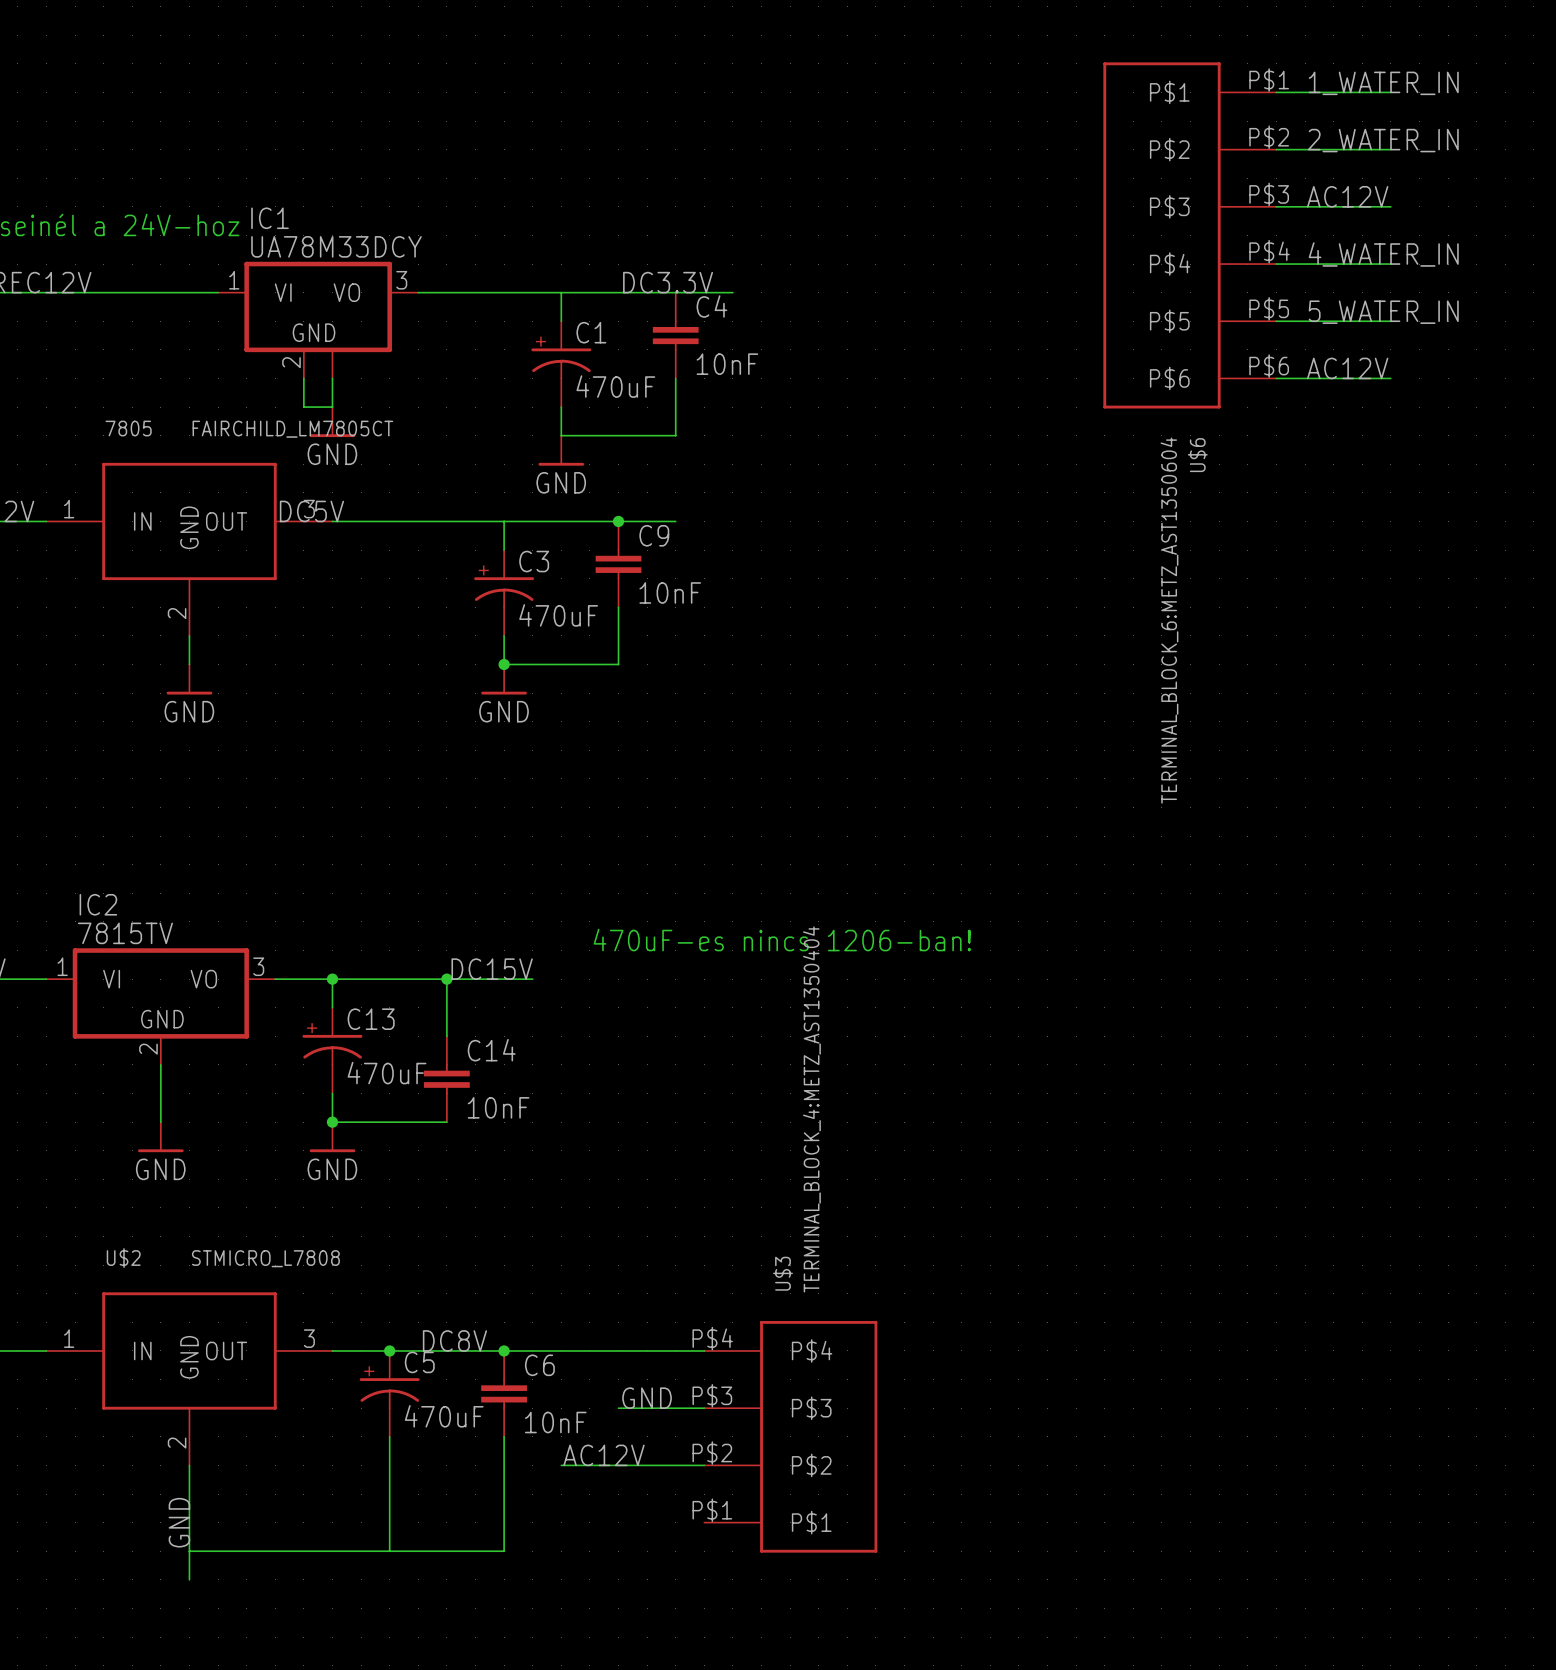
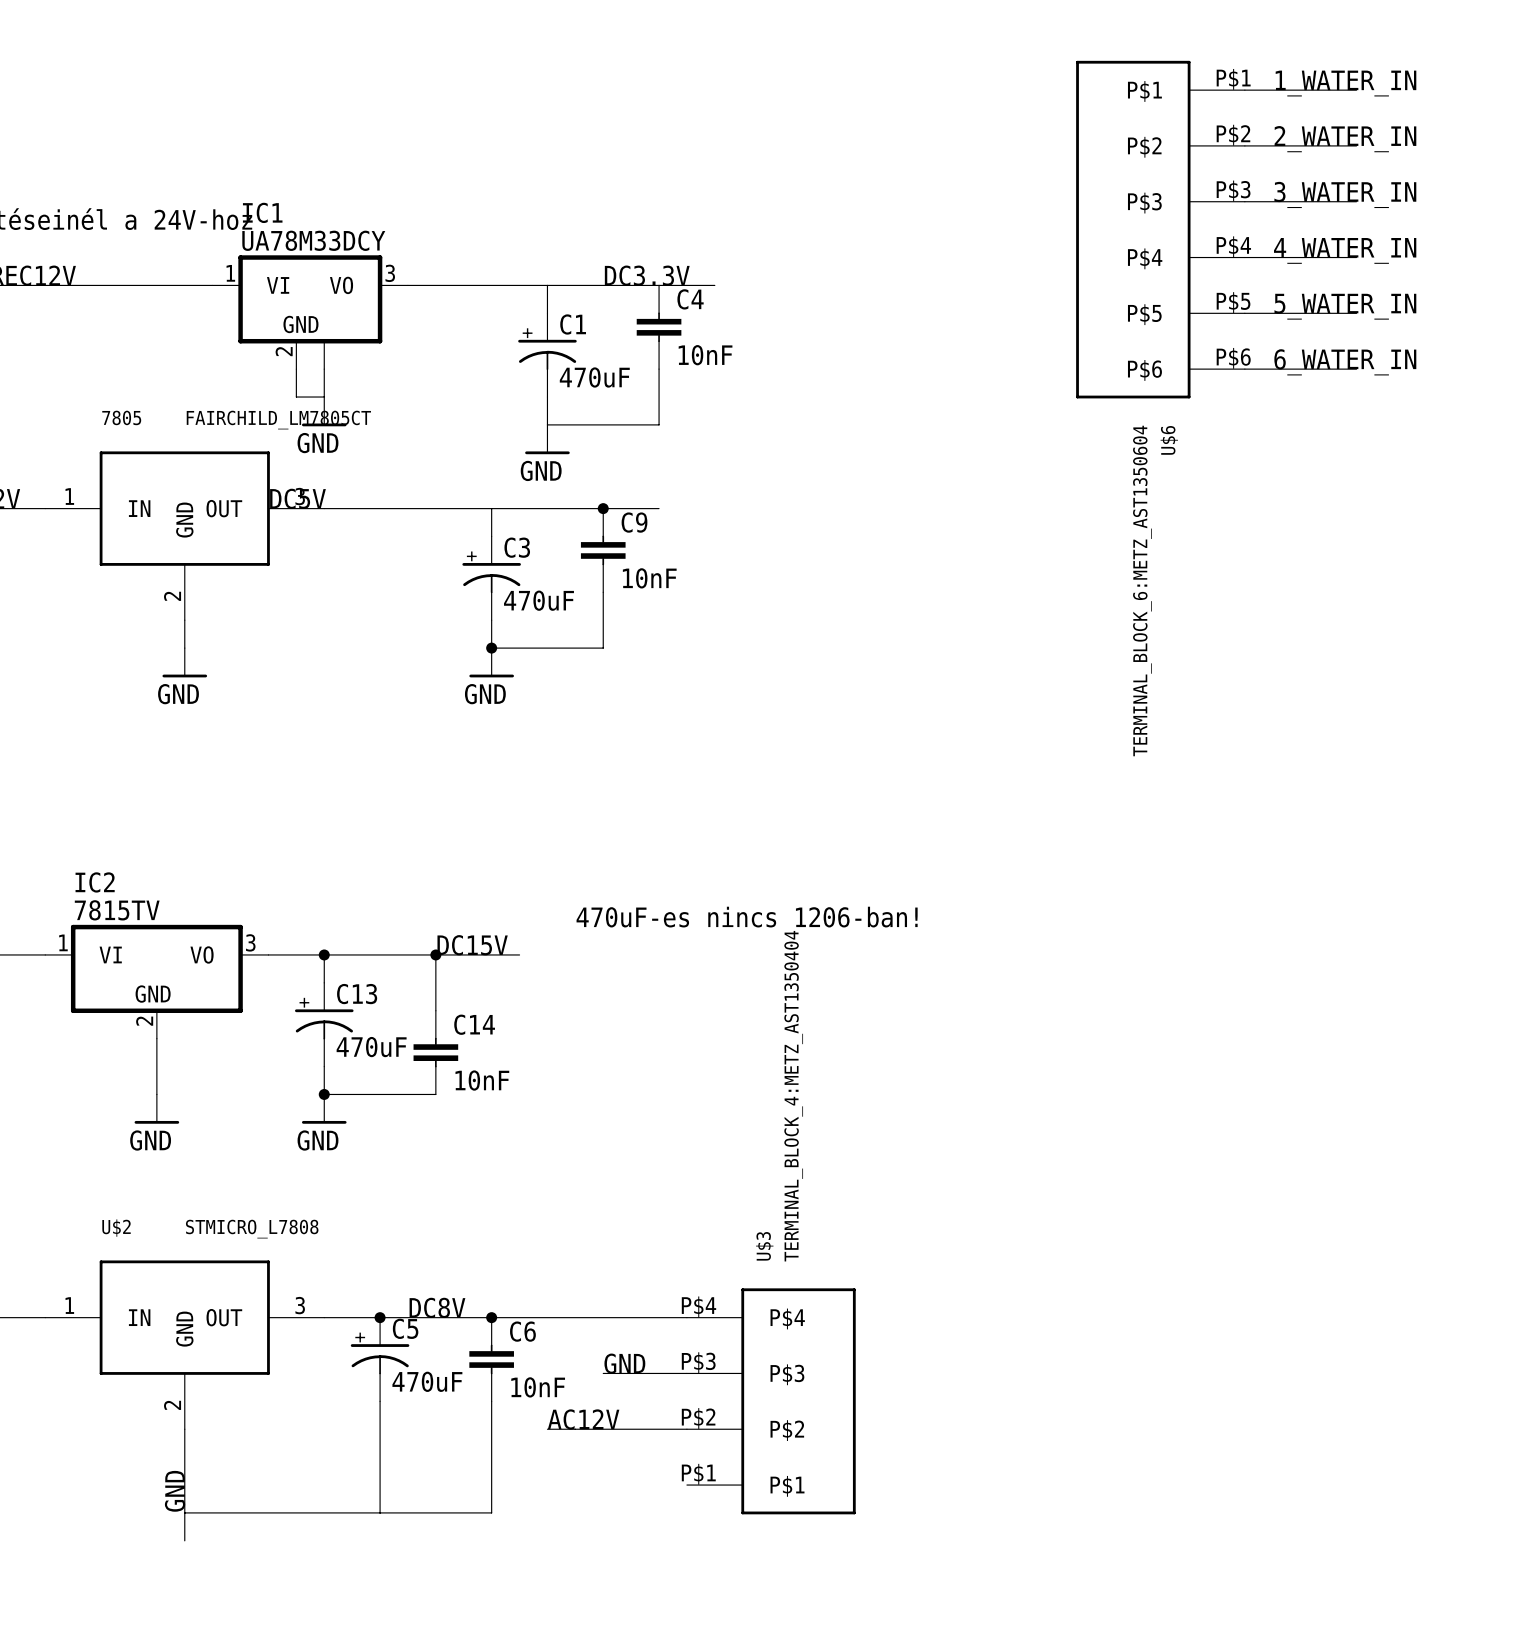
label: AC12V (1347, 196) -> 3_WATER_IN (1345, 194)
label: AC12V (1347, 368) -> 6_WATER_IN (1345, 362)

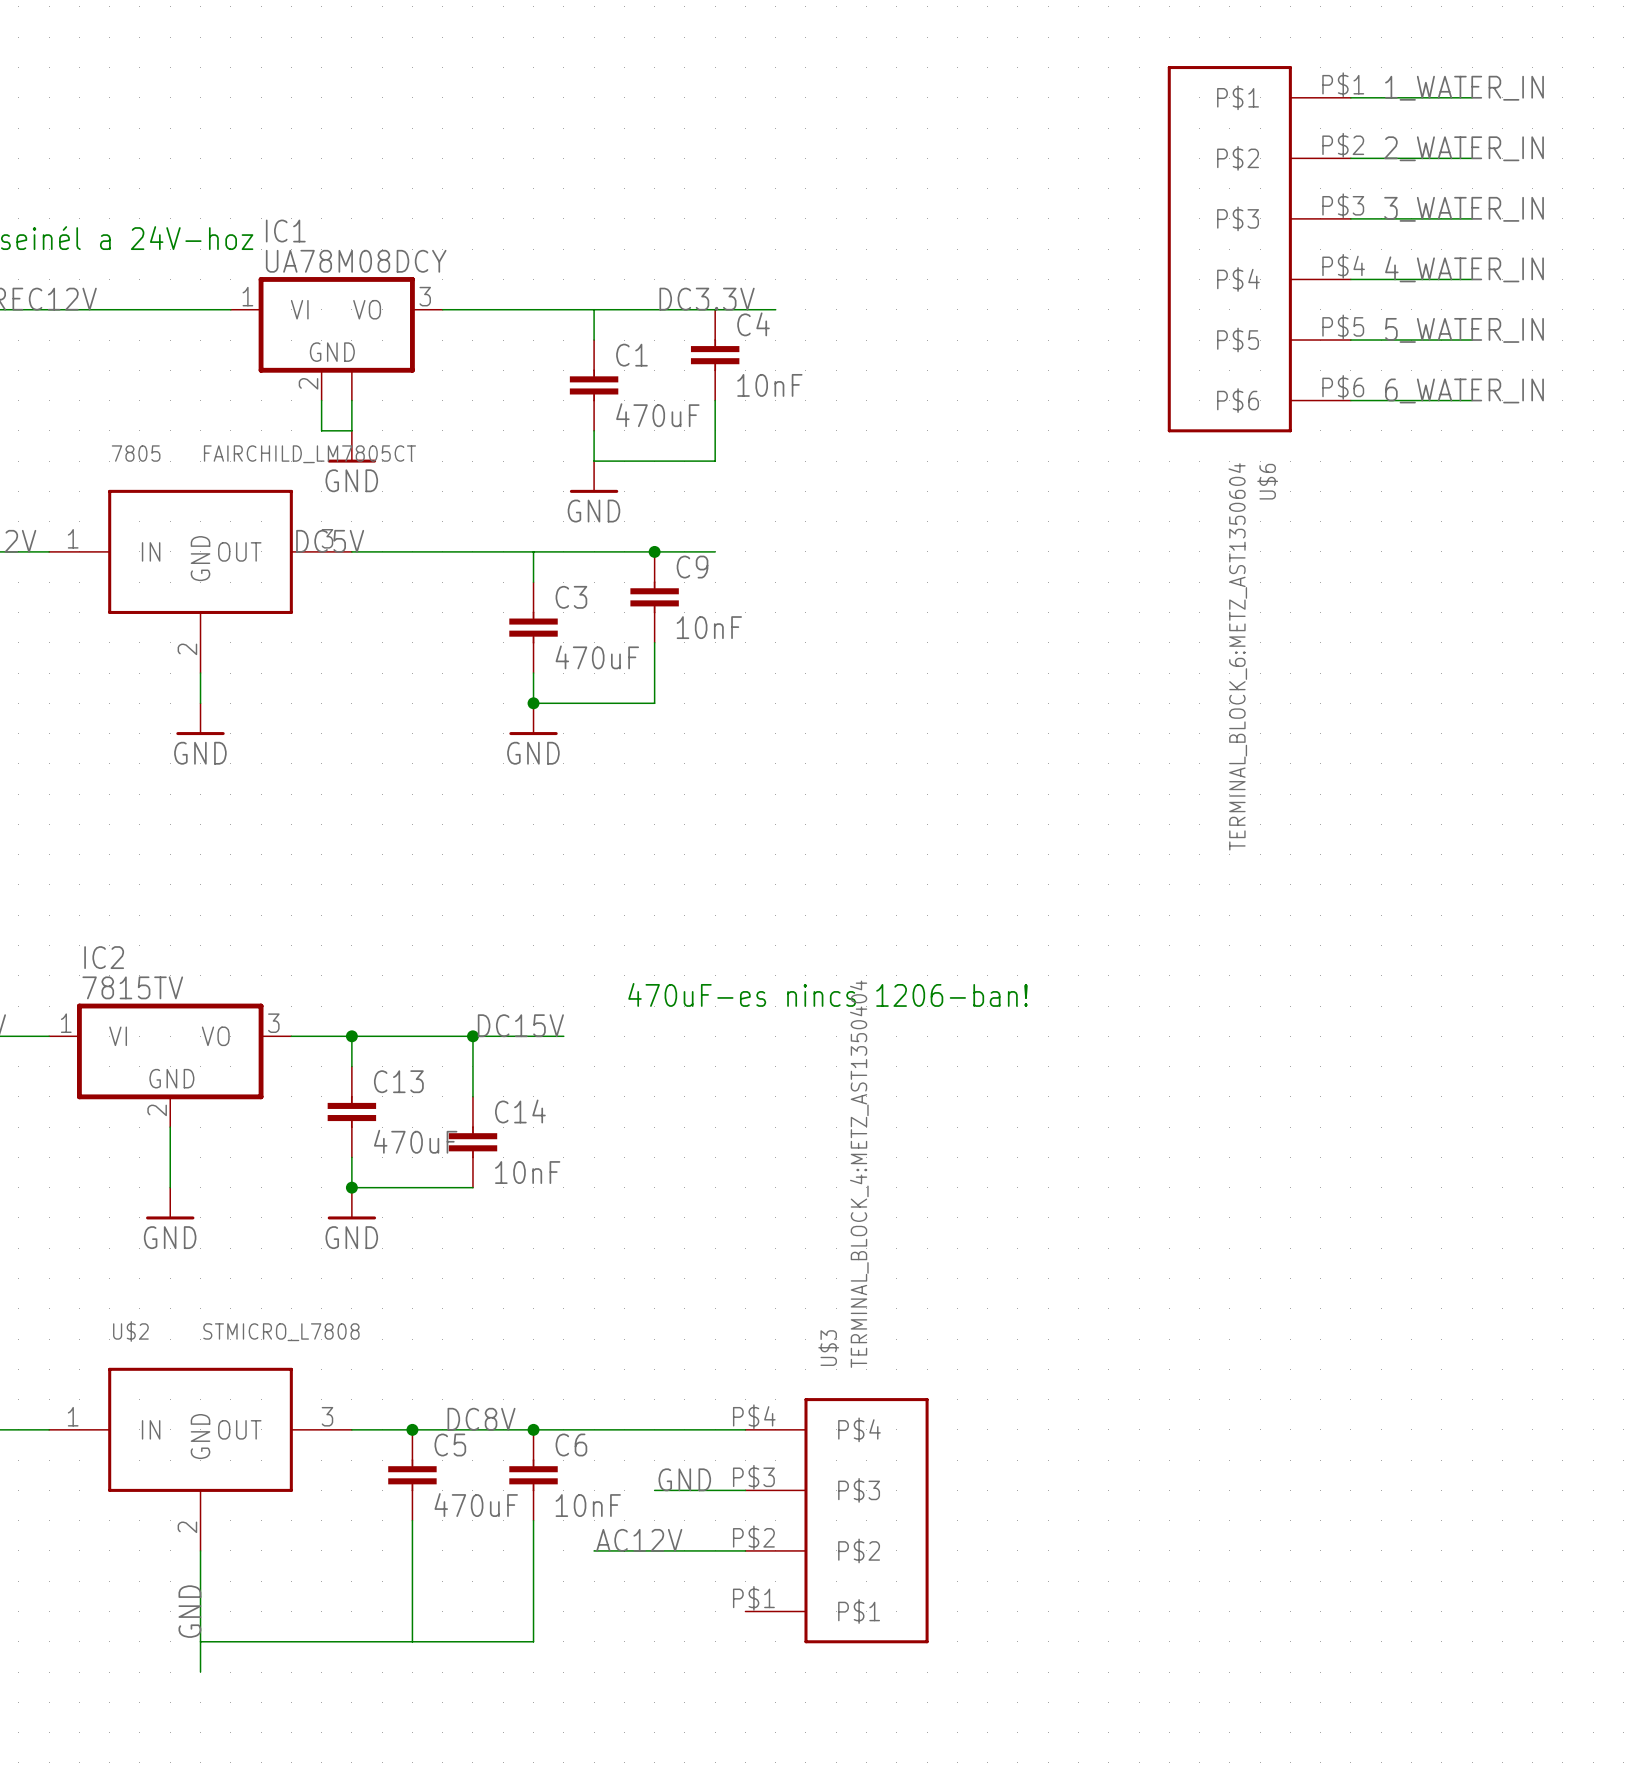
IC1 value: UA78M33DCY (313, 240) -> UA78M08DCY (356, 261)
C1 symbol: [518, 313, 577, 398] -> [569, 340, 619, 431]
C3 symbol: [462, 536, 521, 621] -> [509, 582, 558, 674]
C13 symbol: [294, 982, 354, 1067] -> [327, 1066, 377, 1158]
C5 symbol: [350, 1317, 410, 1402] -> [388, 1429, 437, 1521]

